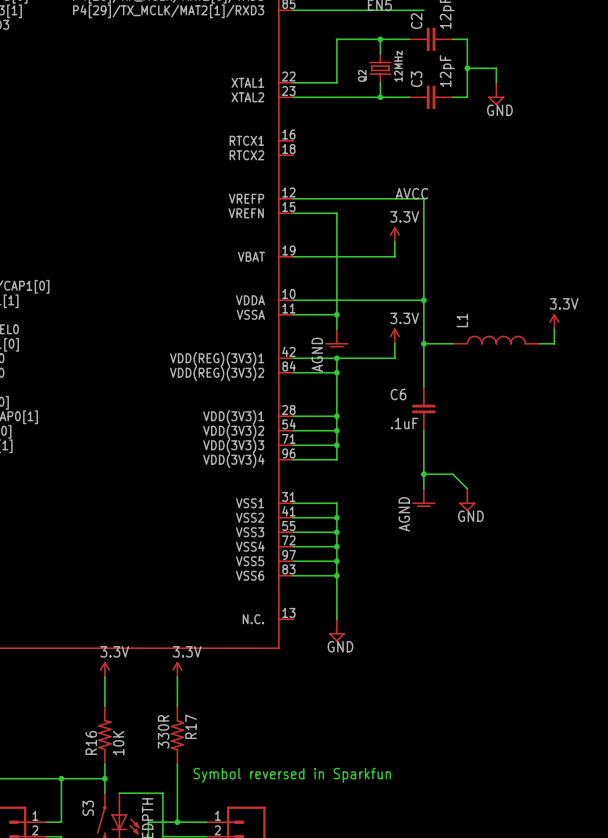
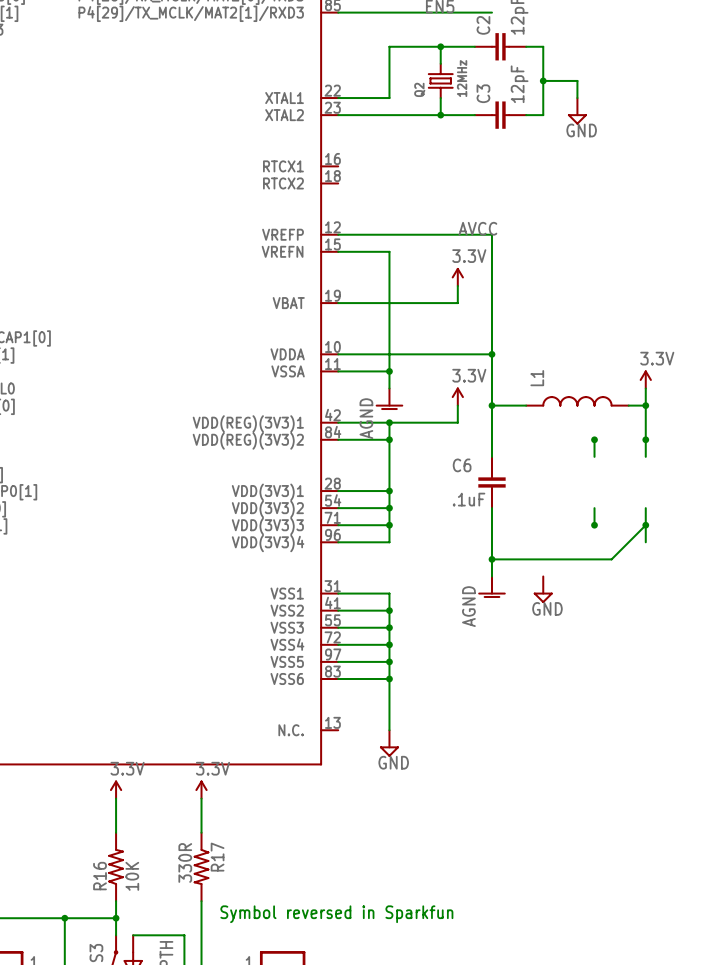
wire: none -> (645, 405) (645, 456)
junction: none -> (645, 405)
wire: none -> (594, 439) (594, 456)
junction: none -> (594, 439)
junction: none -> (645, 439)
wire: none -> (594, 508) (594, 525)
wire: none -> (645, 508) (645, 542)
junction: none -> (594, 525)
junction: none -> (645, 525)
wire: (452, 474) (467, 488) -> (526, 559) (611, 559) (645, 525)

